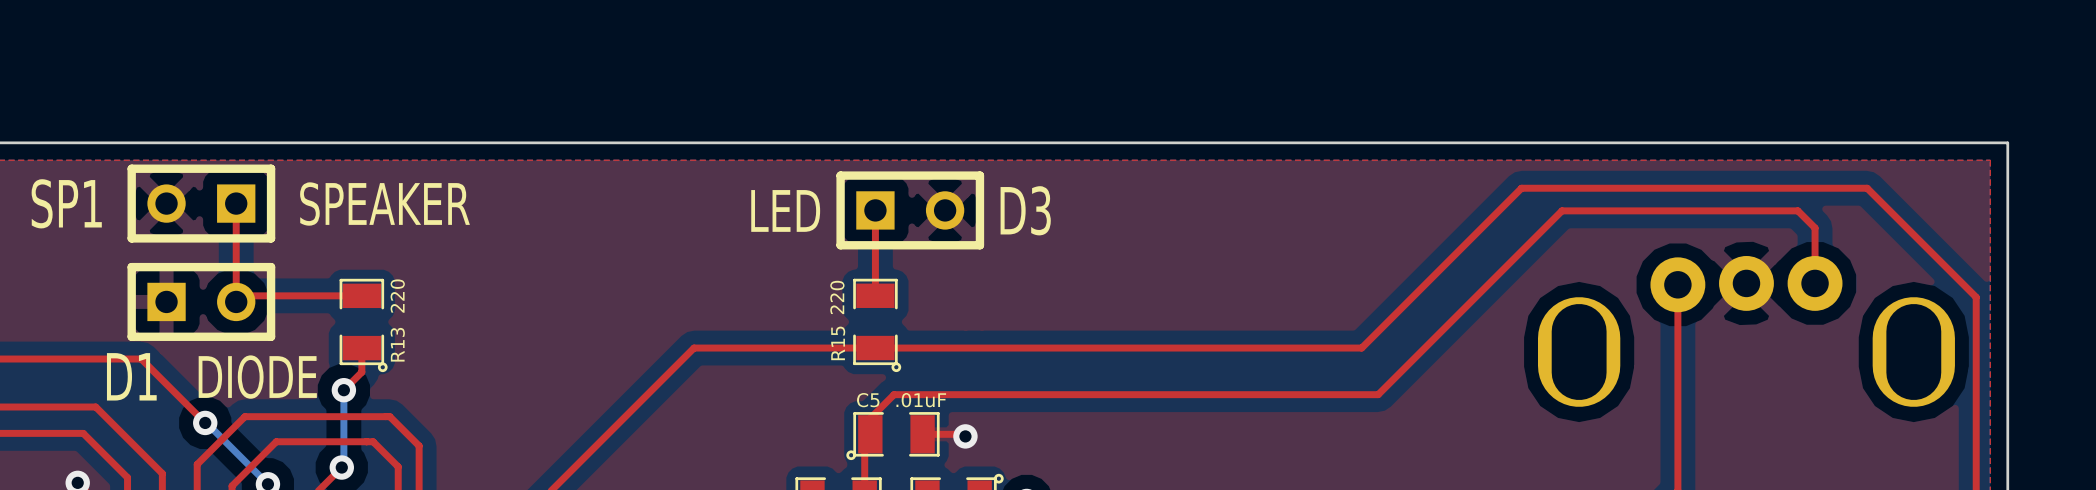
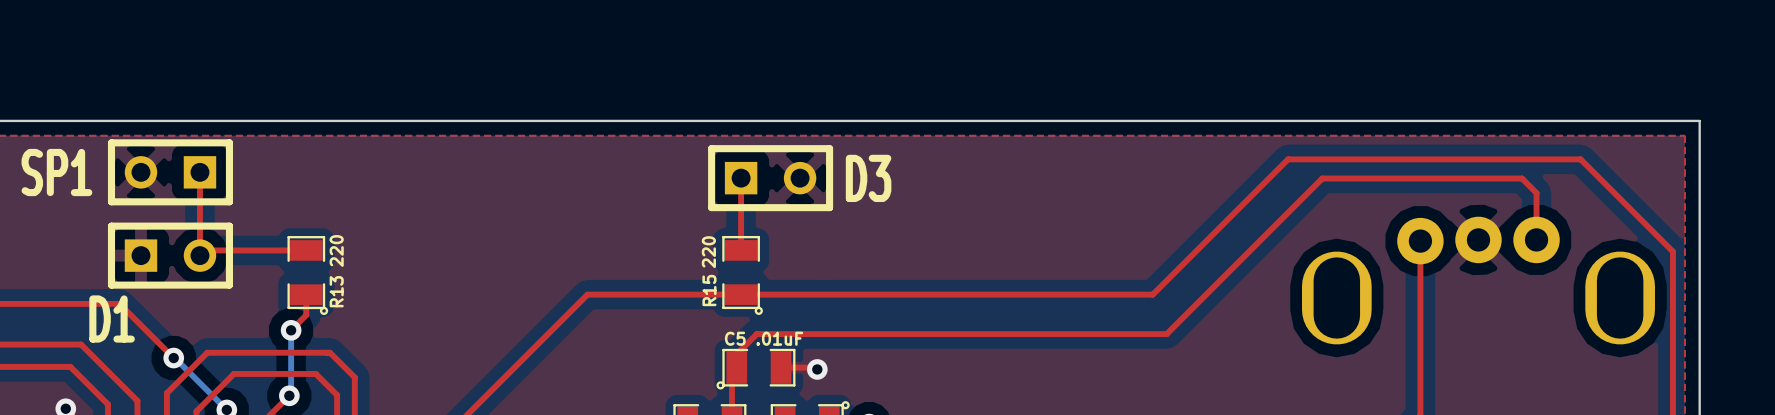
SP1 value: SPEAKER (385, 204) -> none
D3 value: LED (785, 210) -> none
D1 value: DIODE (257, 377) -> none

